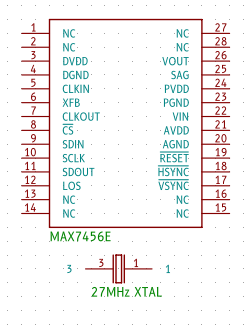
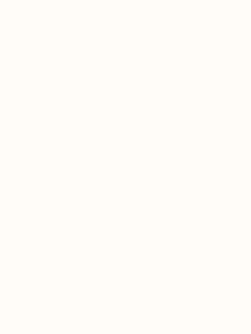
part: (125, 123) -> none
text: MAX7456E (80, 236) -> none
part: (118, 268) -> none
text: 27MHz XTAL (126, 291) -> none

